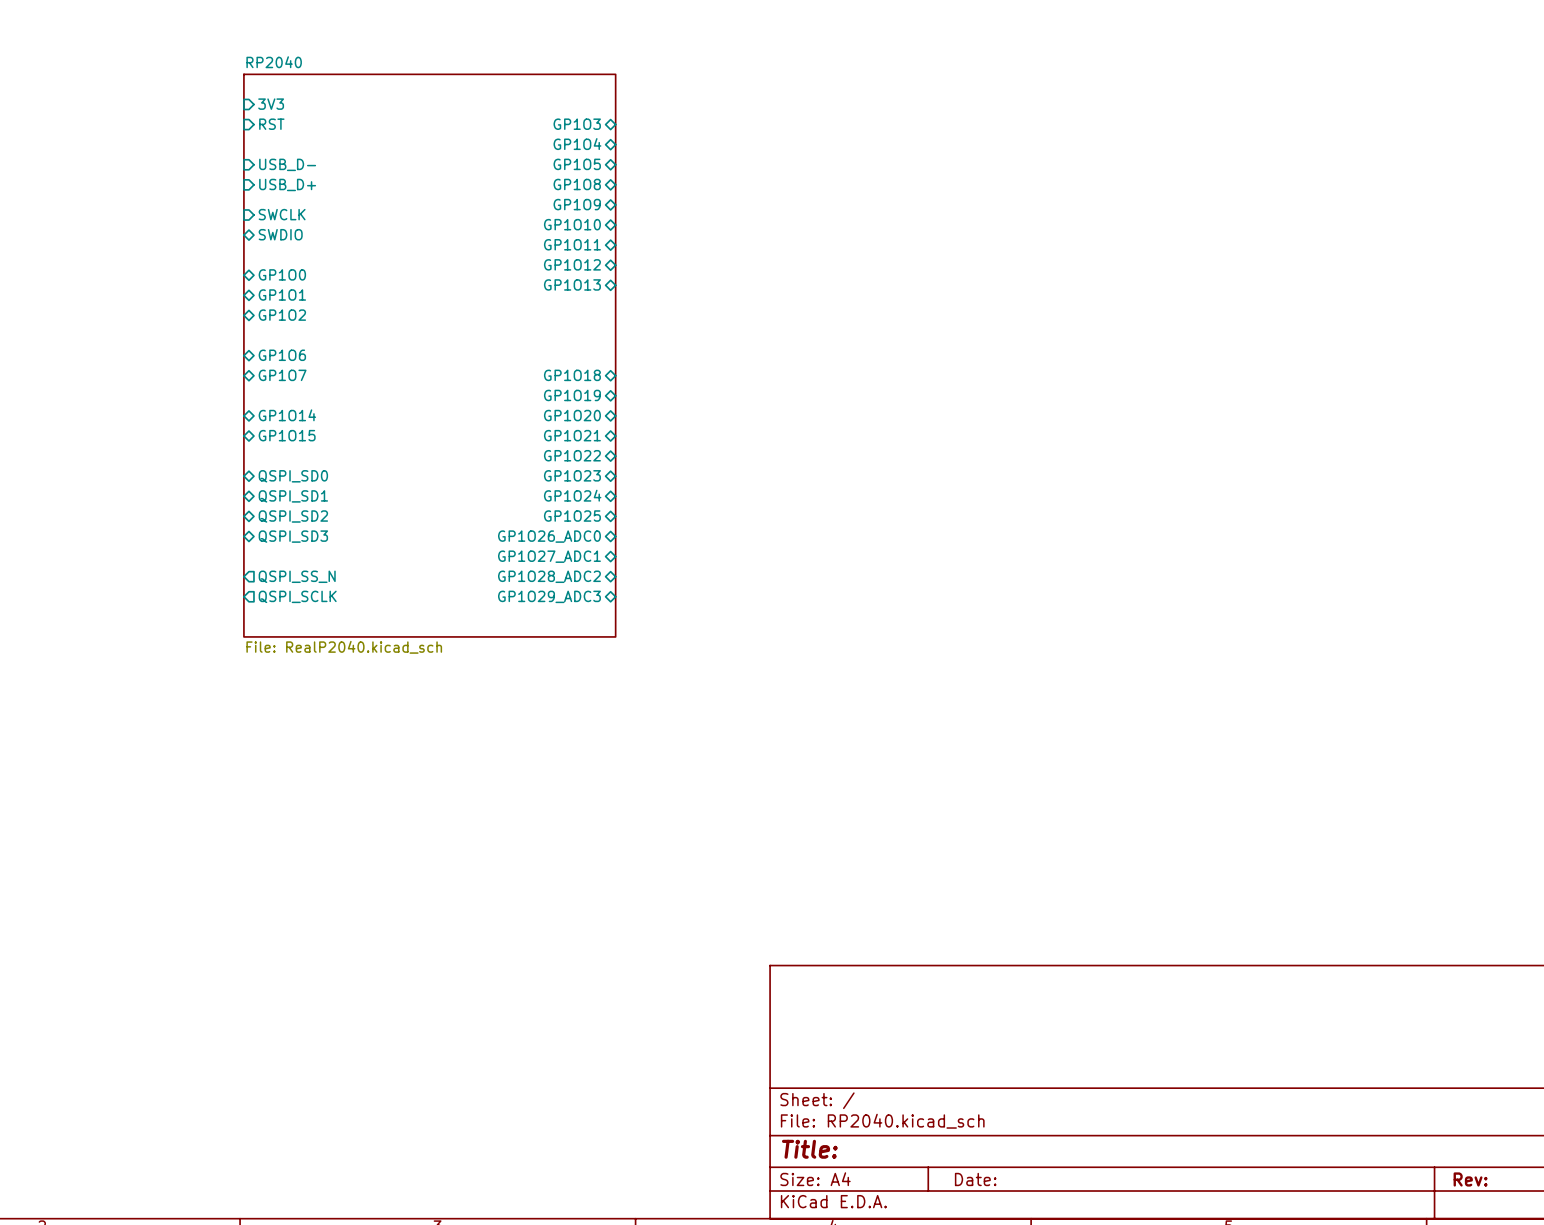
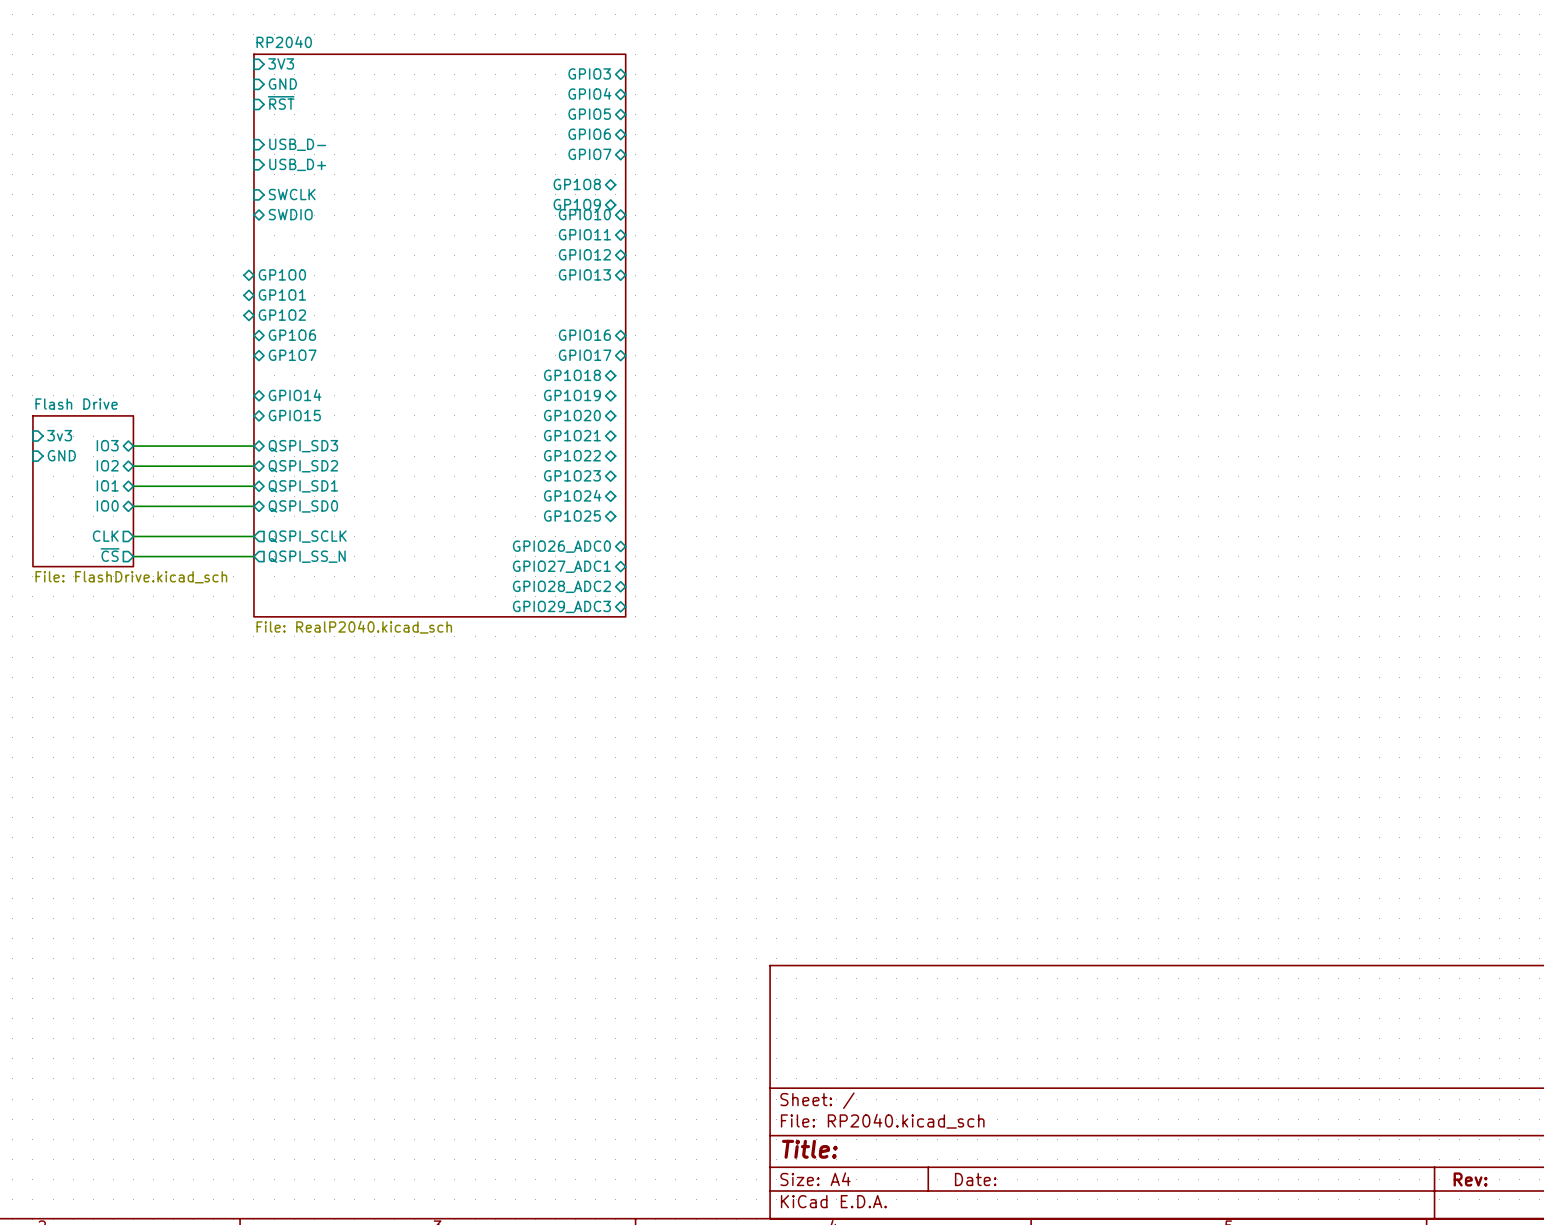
sheet pin: none -> GPIO3 (589, 73)
sheet pin: none -> GND (282, 84)
sheet pin: none -> GPIO4 (589, 93)
sheet pin position: 3V3 (271, 104) -> 3V3 (281, 63)
sheet pin: none -> GPIO5 (589, 114)
sheet pin: RST (271, 124) -> ~{RST} (281, 102)
sheet pin: GP1O3 (577, 124) -> none
sheet pin: none -> GPIO6 (589, 134)
sheet pin: GP1O4 (577, 144) -> none
sheet pin: none -> GPIO7 (589, 154)
sheet pin position: USB_D- (287, 164) -> USB_D- (297, 144)
sheet pin: GP1O5 (577, 164) -> none
sheet pin position: USB_D+ (287, 184) -> USB_D+ (297, 164)
sheet pin position: SWCLK (282, 214) -> SWCLK (292, 194)
sheet pin: none -> GPIO10 (584, 214)
sheet pin: GP1O10 (572, 224) -> none
sheet pin position: SWDIO (280, 234) -> SWDIO (290, 214)
sheet pin: none -> GPIO11 (584, 234)
sheet pin: GP1O11 (572, 244) -> none
sheet pin: none -> GPIO12 (584, 254)
sheet pin: GP1O12 (572, 264) -> none
sheet pin: none -> GPIO13 (584, 274)
sheet pin: GP1O13 (572, 284) -> none
sheet pin: none -> GPIO16 (584, 335)
sheet pin position: GP1O6 (282, 355) -> GP1O6 (292, 335)
sheet RP2040 position: (429, 355) -> (439, 335)
sheet pin: none -> GPIO17 (585, 355)
sheet pin position: GP1O7 (282, 375) -> GP1O7 (292, 355)
sheet pin: none -> GPIO14 (295, 395)
sheet pin: GP1O14 (287, 415) -> GPIO15 (294, 415)
sheet pin: none -> 3v3 (59, 435)
sheet pin: GP1O15 (287, 435) -> none
sheet pin: none -> IO3 (107, 445)
wire: none -> (133, 446) (253, 446)
sheet pin: none -> GND (61, 455)
sheet pin: none -> IO2 (107, 465)
wire: none -> (133, 466) (253, 466)
sheet pin position: QSPI_SD0 (293, 476) -> QSPI_SD0 (303, 506)
sheet pin: none -> IO1 (107, 485)
wire: none -> (133, 486) (253, 486)
sheet Flash Drive: none -> File: FlashDrive.kicad_sch (83, 491)
sheet pin position: QSPI_SD1 (293, 496) -> QSPI_SD1 (303, 486)
sheet pin: none -> IO0 (107, 505)
wire: none -> (133, 506) (253, 506)
sheet pin position: QSPI_SD2 (293, 516) -> QSPI_SD2 (303, 466)
sheet pin: none -> CLK (105, 536)
wire: none -> (133, 536) (253, 536)
sheet pin position: QSPI_SD3 (293, 536) -> QSPI_SD3 (303, 446)
sheet pin: GP1O26_ADC0 (549, 536) -> none
sheet pin: none -> GPIO26_ADC0 (561, 546)
sheet pin: none -> ~{CS} (110, 555)
wire: none -> (133, 556) (253, 556)
sheet pin: GP1O27_ADC1 (549, 556) -> none
sheet pin: none -> GPIO27_ADC1 (561, 566)
sheet pin position: QSPI_SS_N (297, 576) -> QSPI_SS_N (307, 556)
sheet pin: GP1O28_ADC2 (549, 576) -> none
sheet pin: none -> GPIO28_ADC2 (561, 586)
sheet pin position: QSPI_SCLK (297, 596) -> QSPI_SCLK (307, 536)
sheet pin: GP1O29_ADC3 (549, 596) -> none
sheet pin: none -> GPIO29_ADC3 (561, 606)

